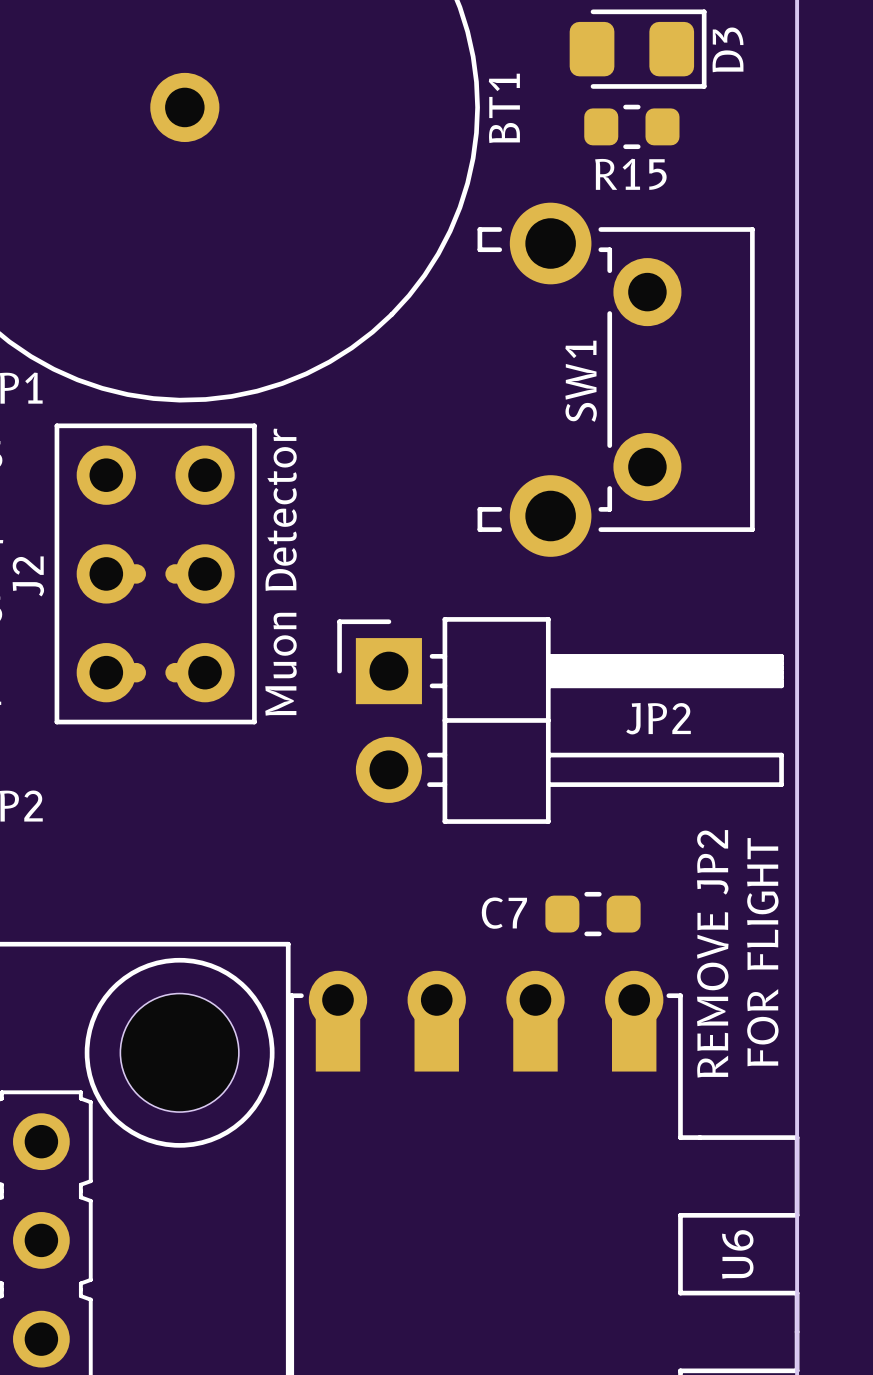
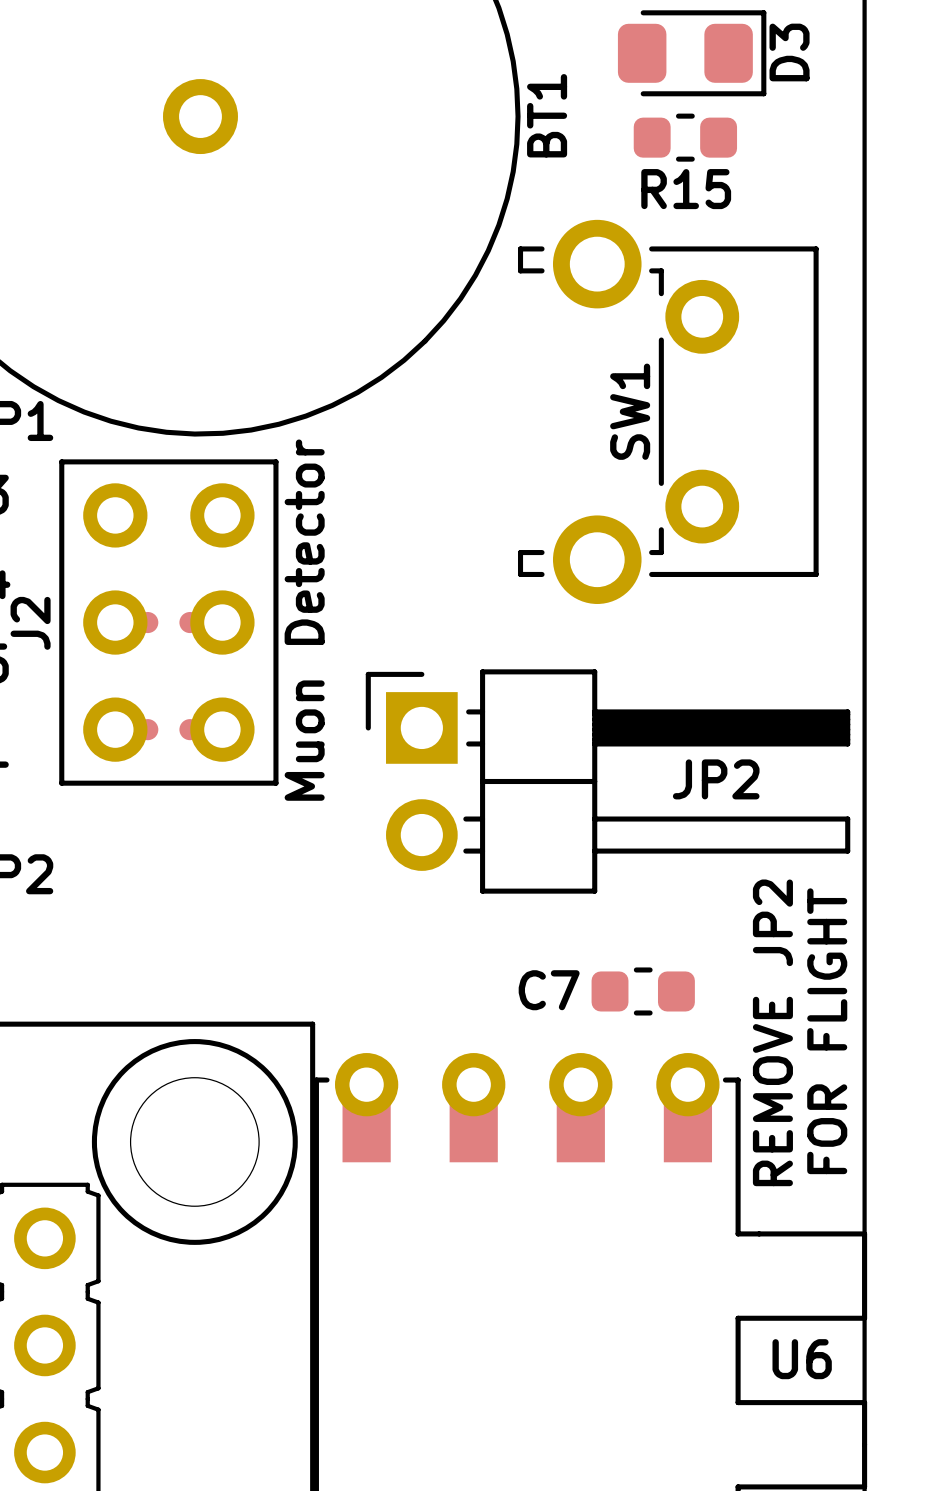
U6 name rotation: 0° (737, 1254) -> 90° clockwise (802, 1359)

